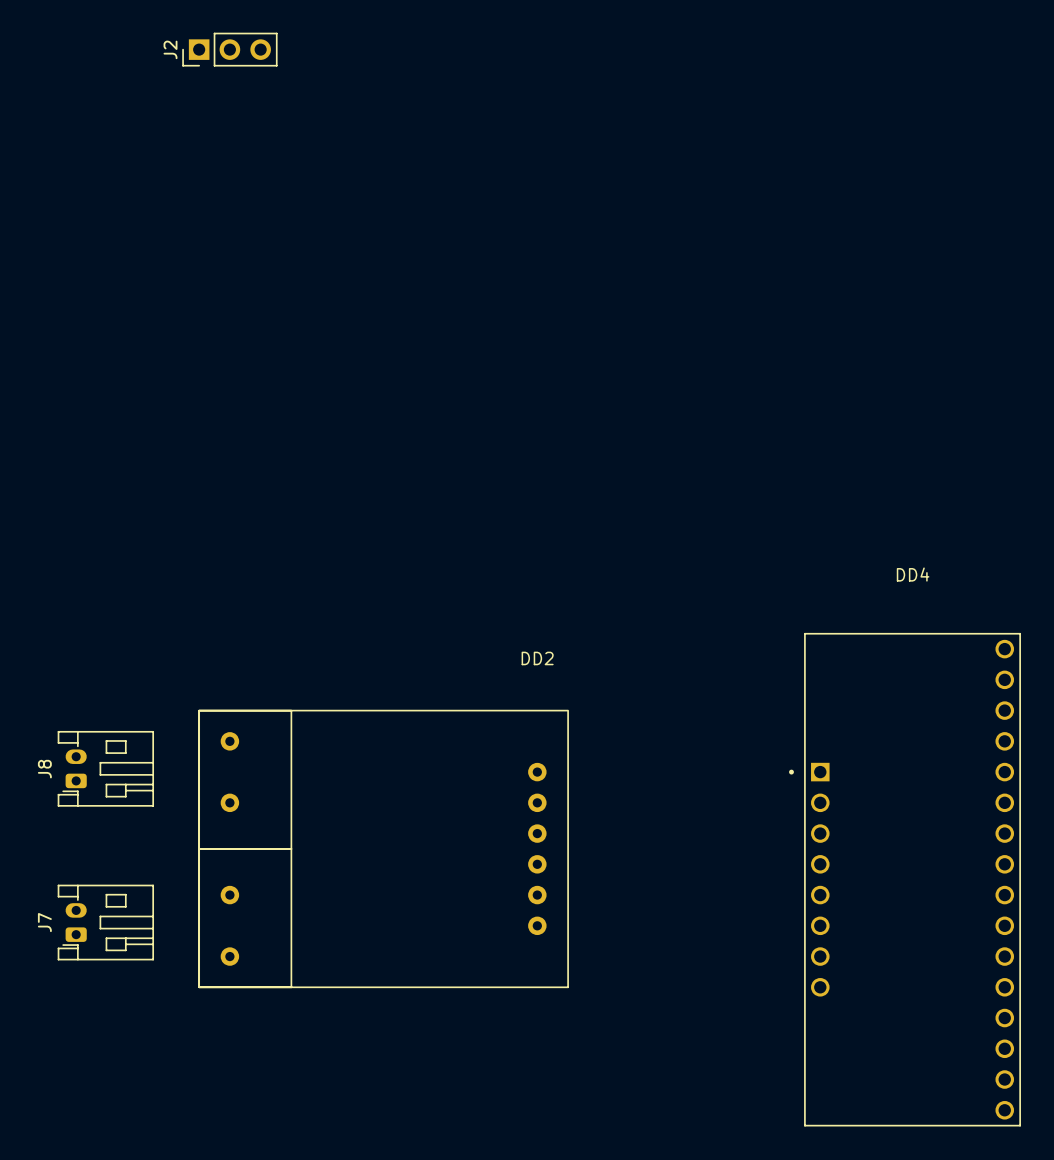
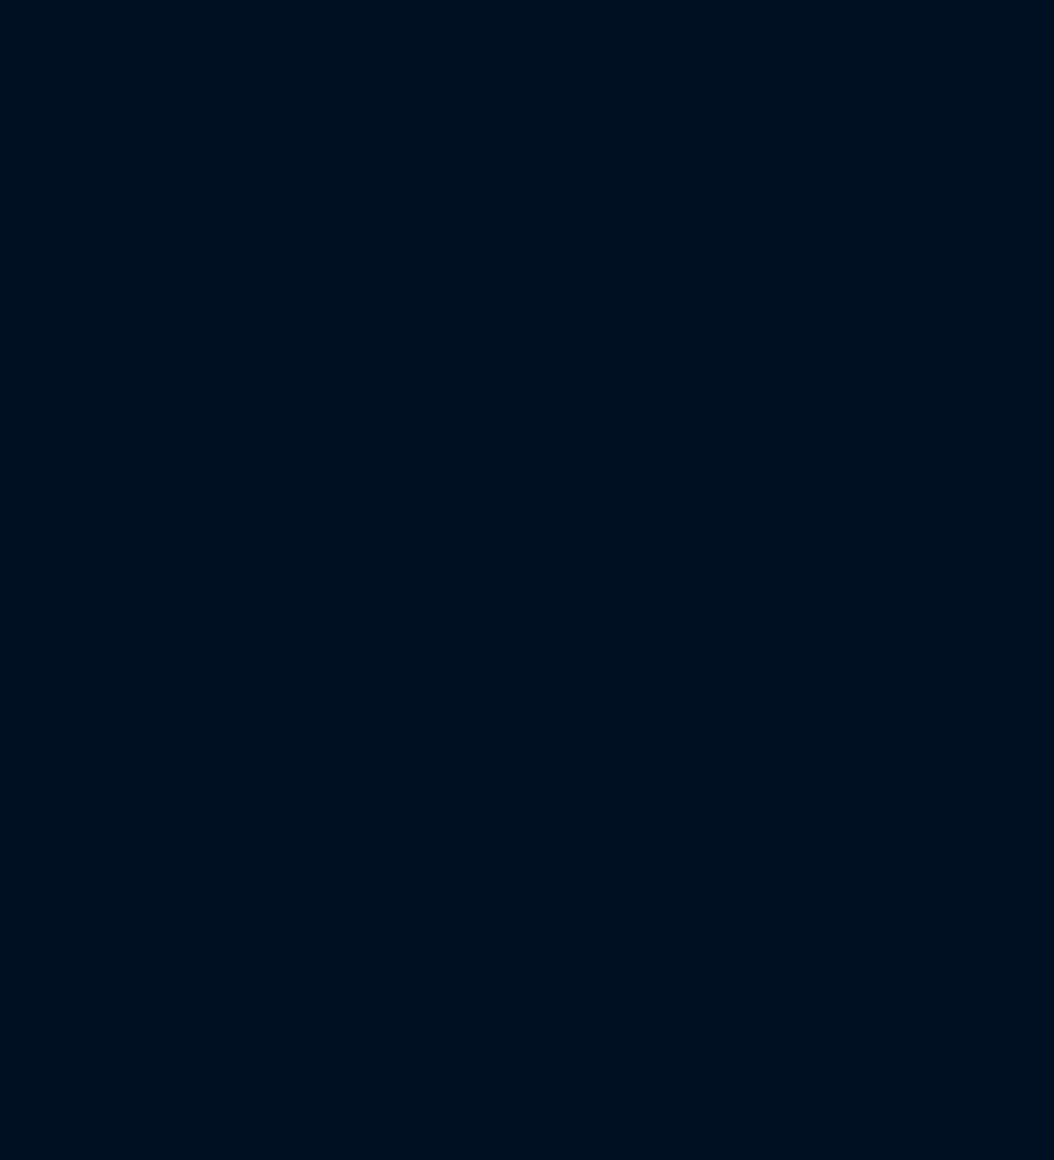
J2: (229, 49) -> none
J8: (105, 768) -> none
DD2: (383, 848) -> none
DD4: (904, 879) -> none
J7: (105, 922) -> none

